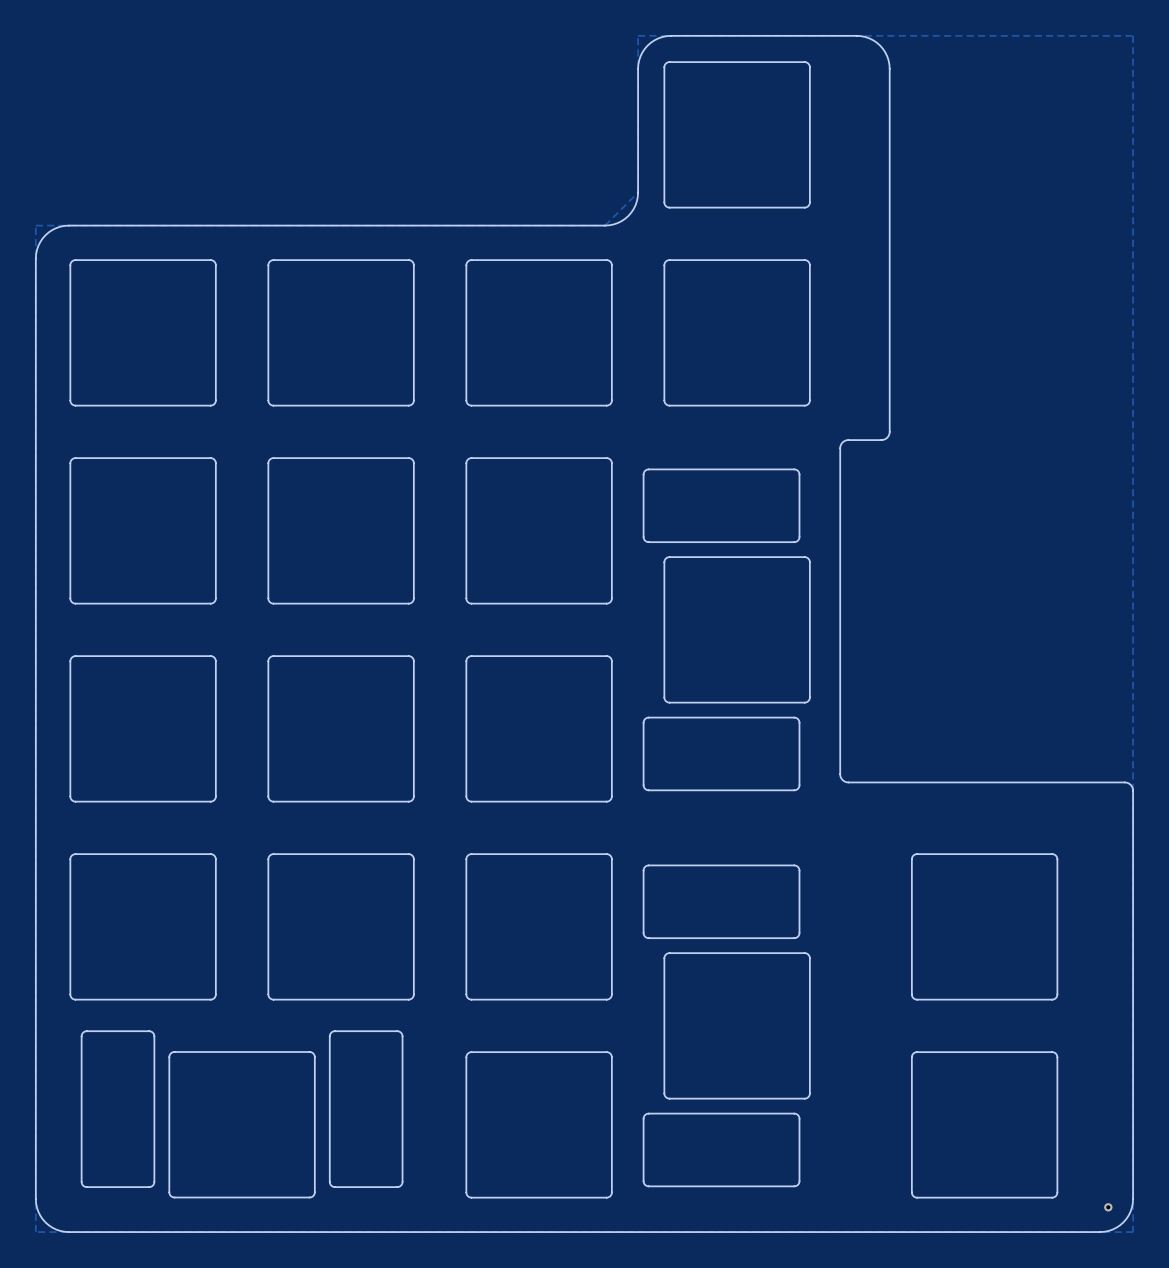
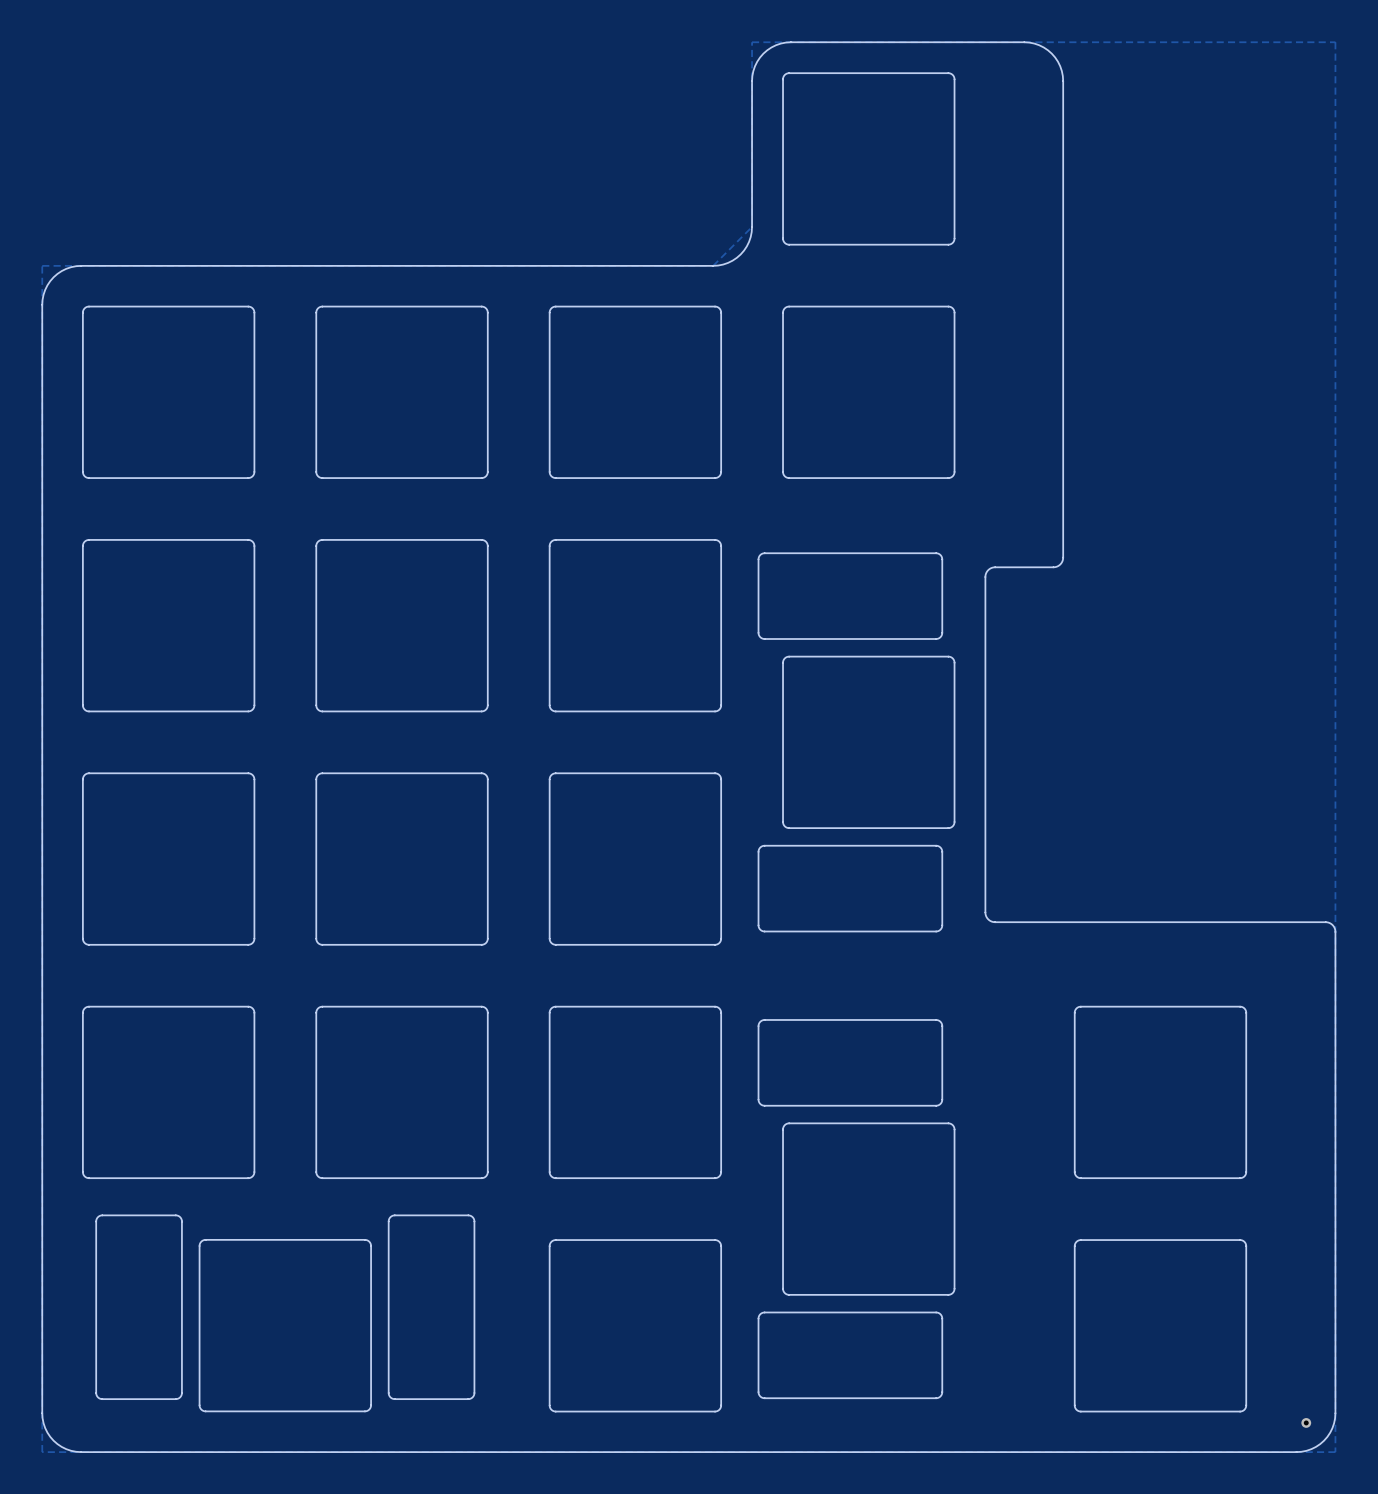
board edge: (856, 35) (865, 36) (876, 42) (885, 52) (889, 64) (889, 431) (887, 436) (883, 439) (847, 440) (842, 442) (840, 447) (840, 774) (842, 780) (848, 782) -> (1009, 42) (1029, 42) (1043, 47) (1055, 57) (1062, 76) (1063, 557) (1061, 563) (1055, 566) (993, 567) (988, 570) (985, 575) (985, 912) (990, 920) (999, 922)

